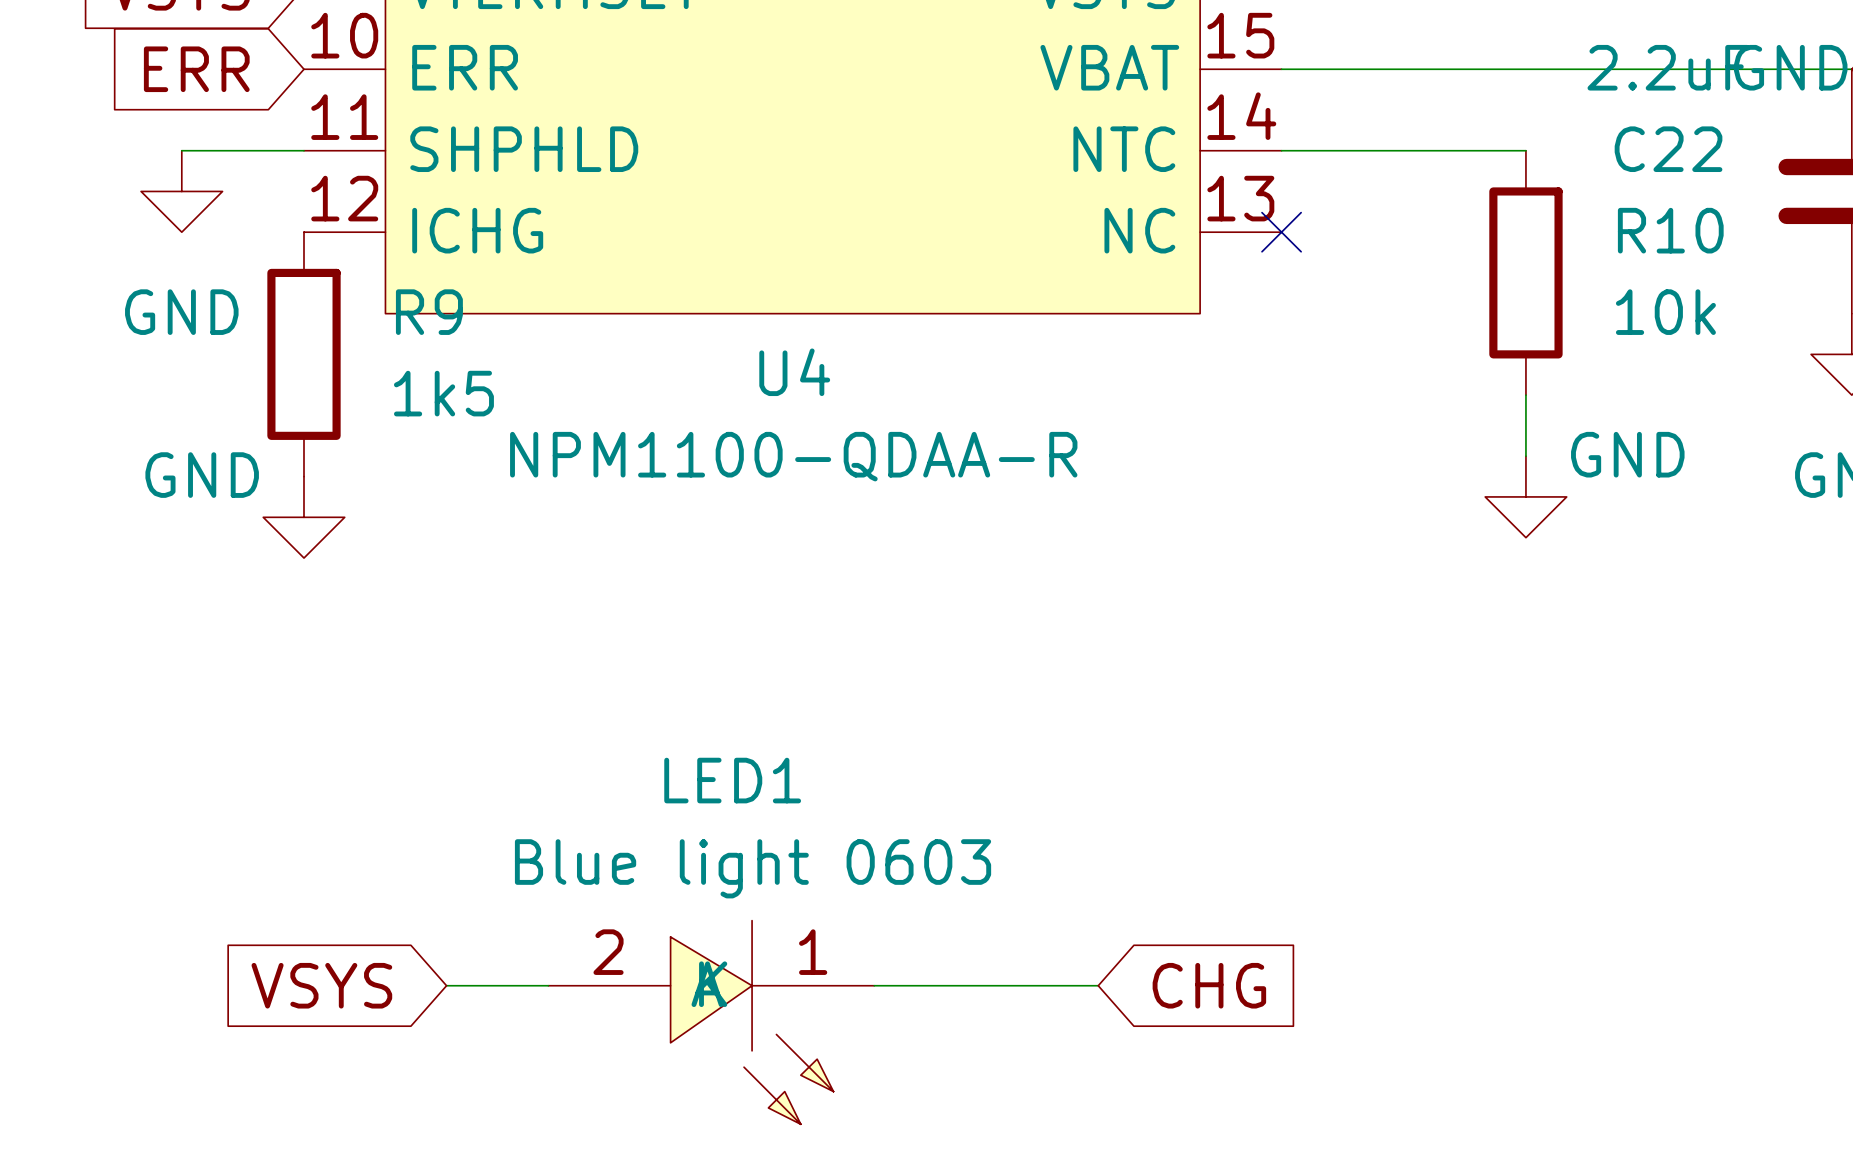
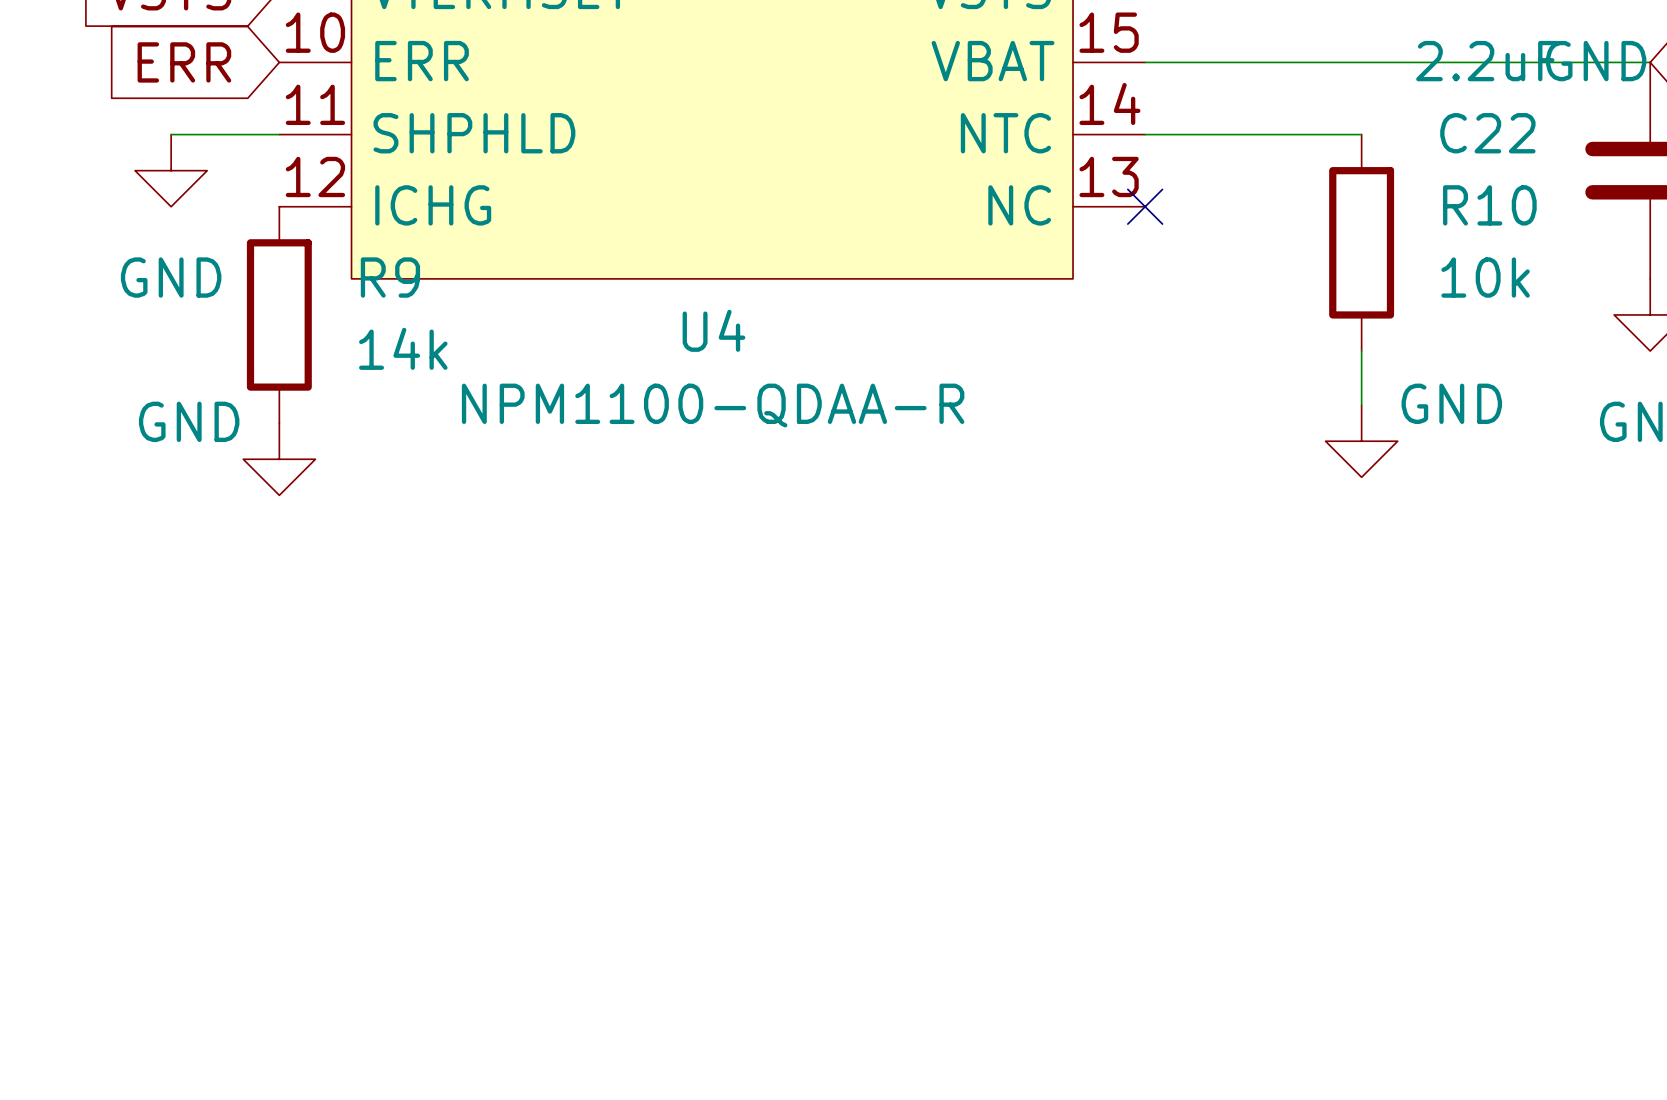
R9 value: 1k5 (443, 393) -> 14k (403, 348)
global label: VSYS (321, 985) -> none
wire: (446, 985) (548, 985) -> none
wire: (874, 985) (1098, 985) -> none
global label: CHG (1209, 985) -> none
LED1: Blue light 0603 (711, 1022) -> none

